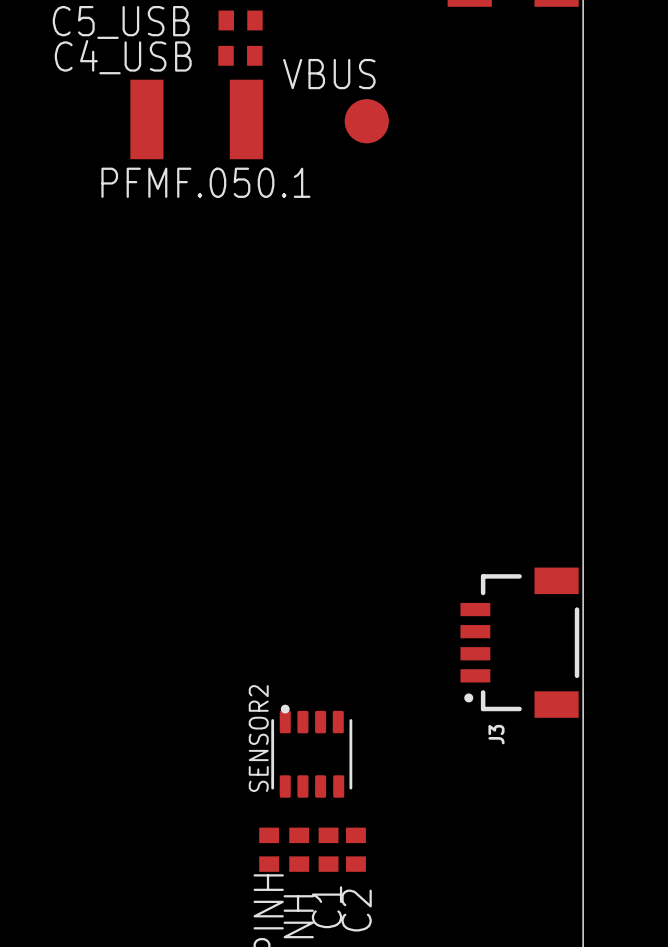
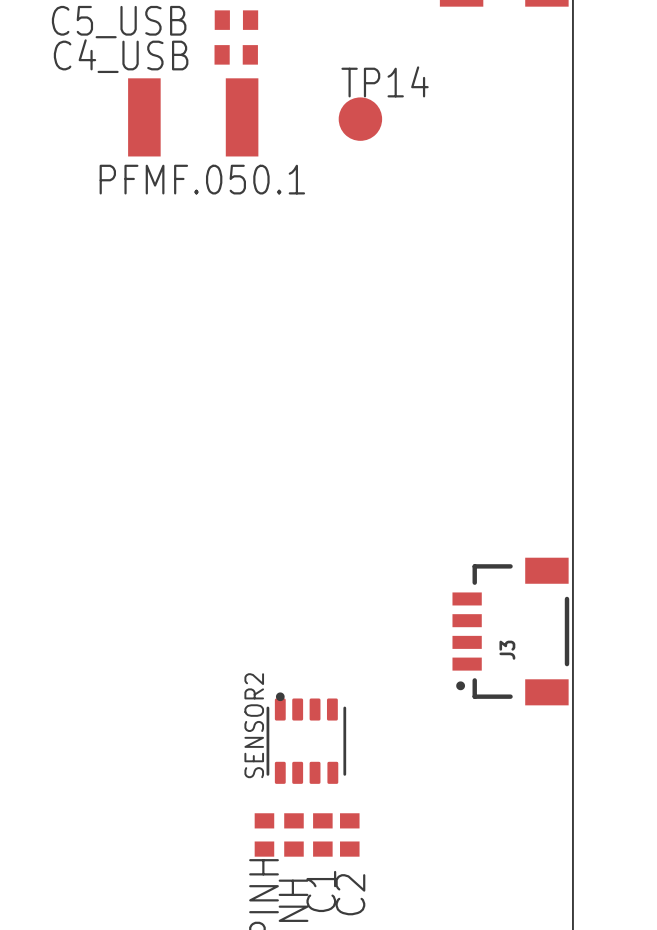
text: VBUS (329, 74) -> none
TP14 name: none -> TP14 (385, 81)
J3 name position: J3 (496, 734) -> J3 (507, 650)

